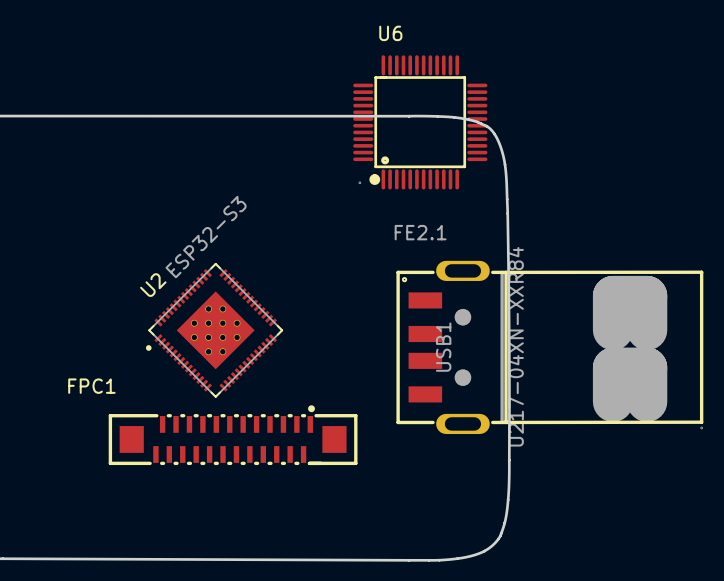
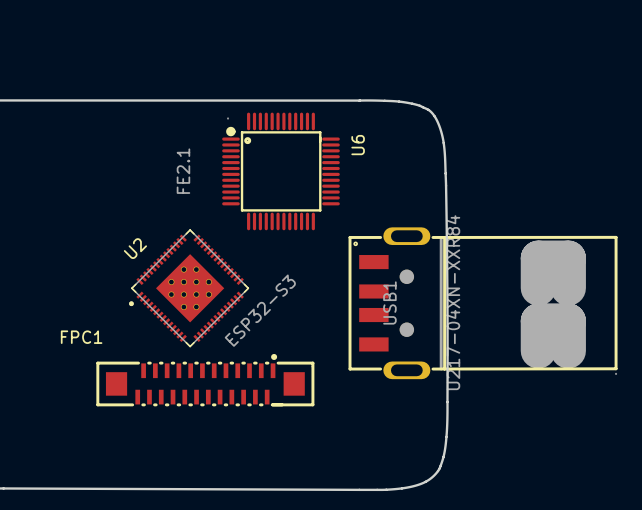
U6 rotation: 0° (420, 122) -> 90° clockwise (280, 171)
U6 position: (420, 122) -> (280, 171)
U2 value position: ESP32-S3 (206, 237) -> ESP32-S3 (260, 310)

